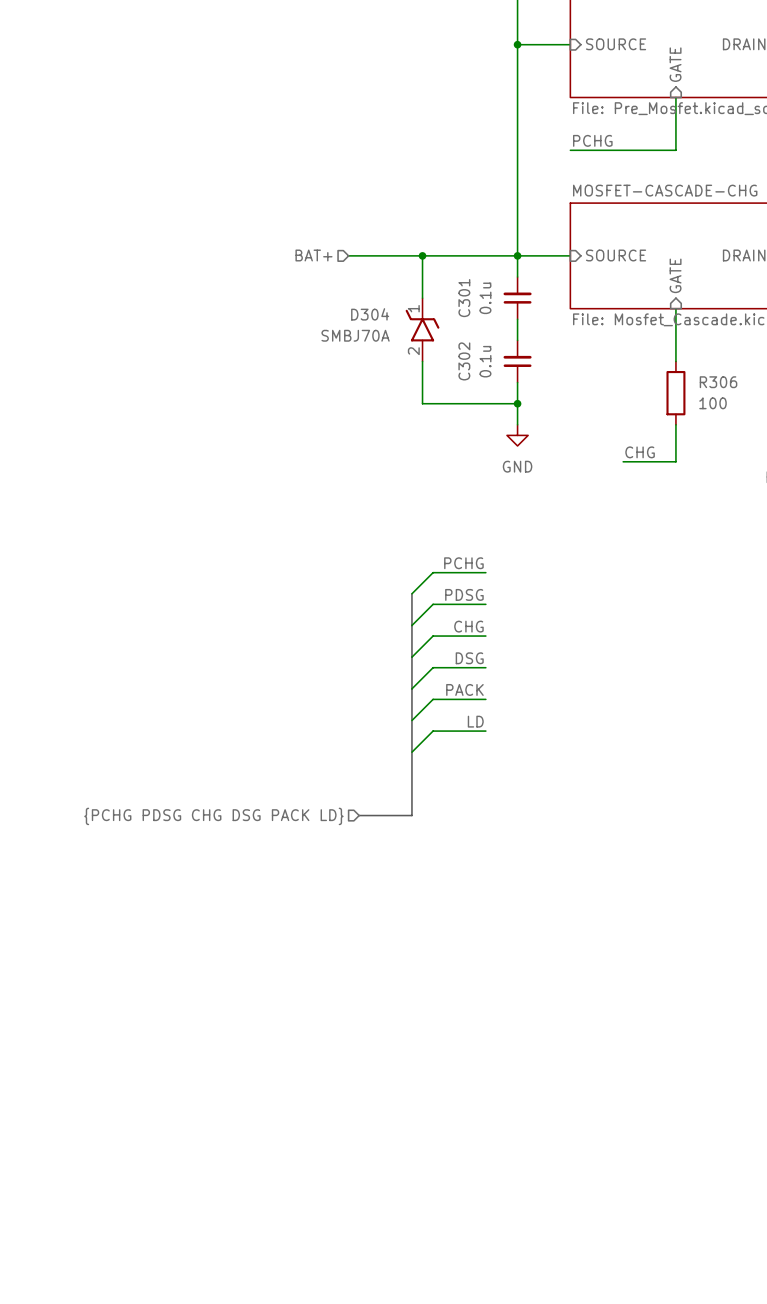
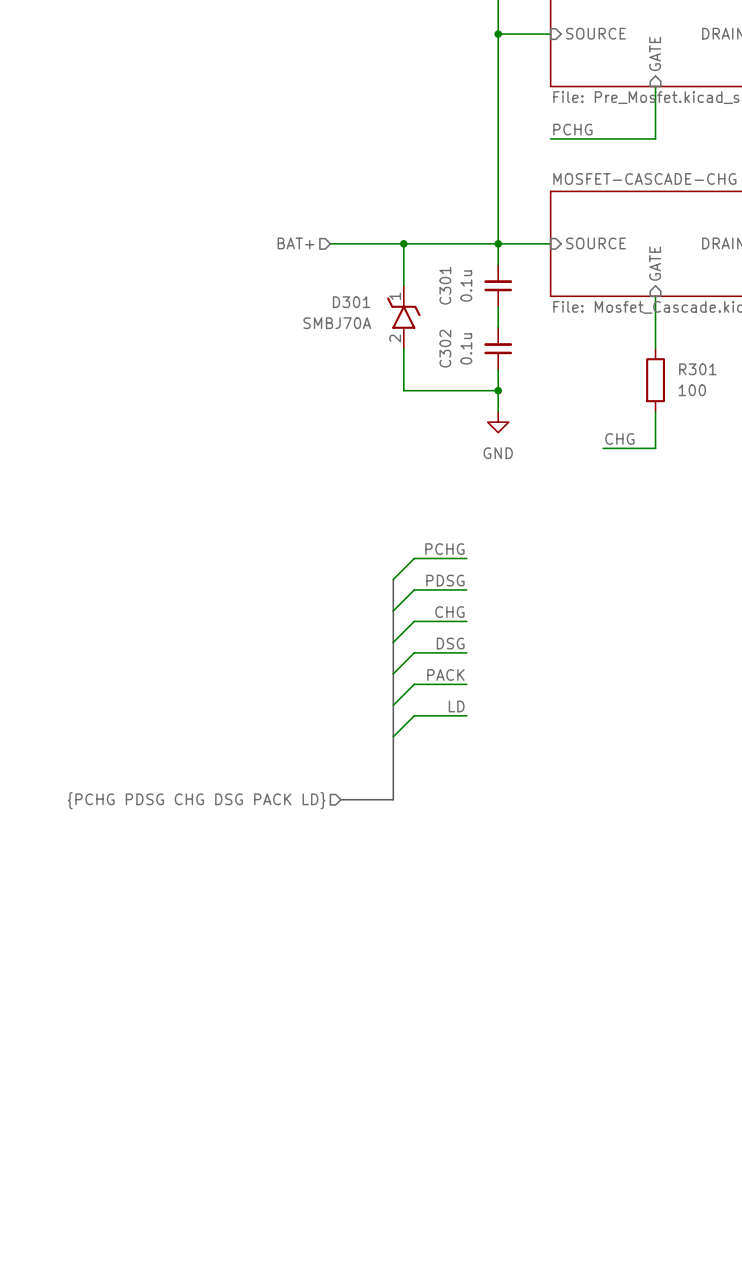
D304 name: D304 (370, 314) -> D301 (351, 302)
R306 name: R306 (718, 382) -> R301 (697, 369)

